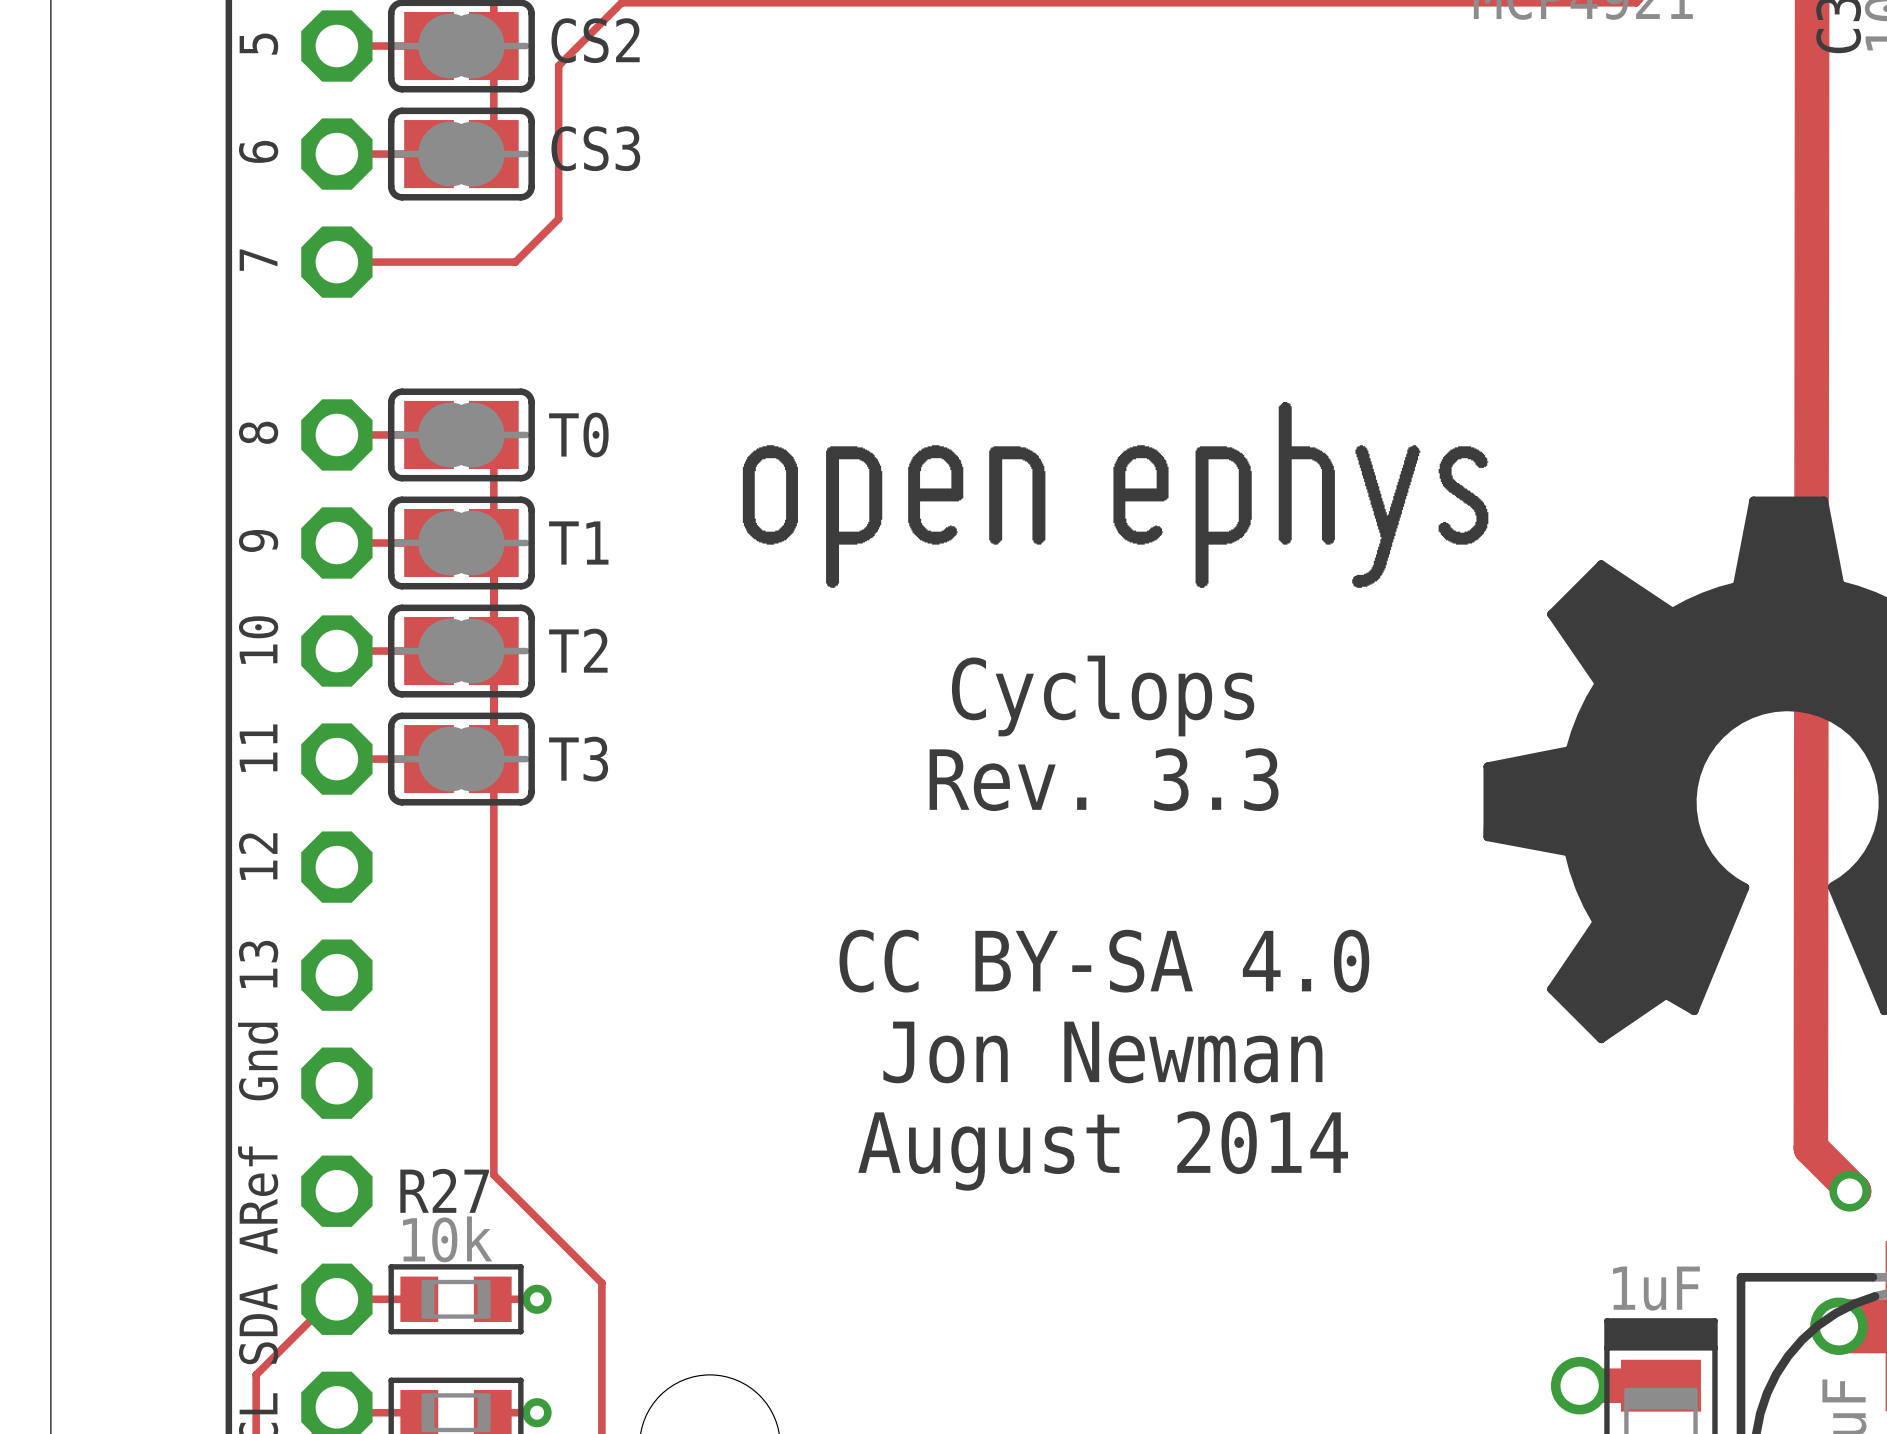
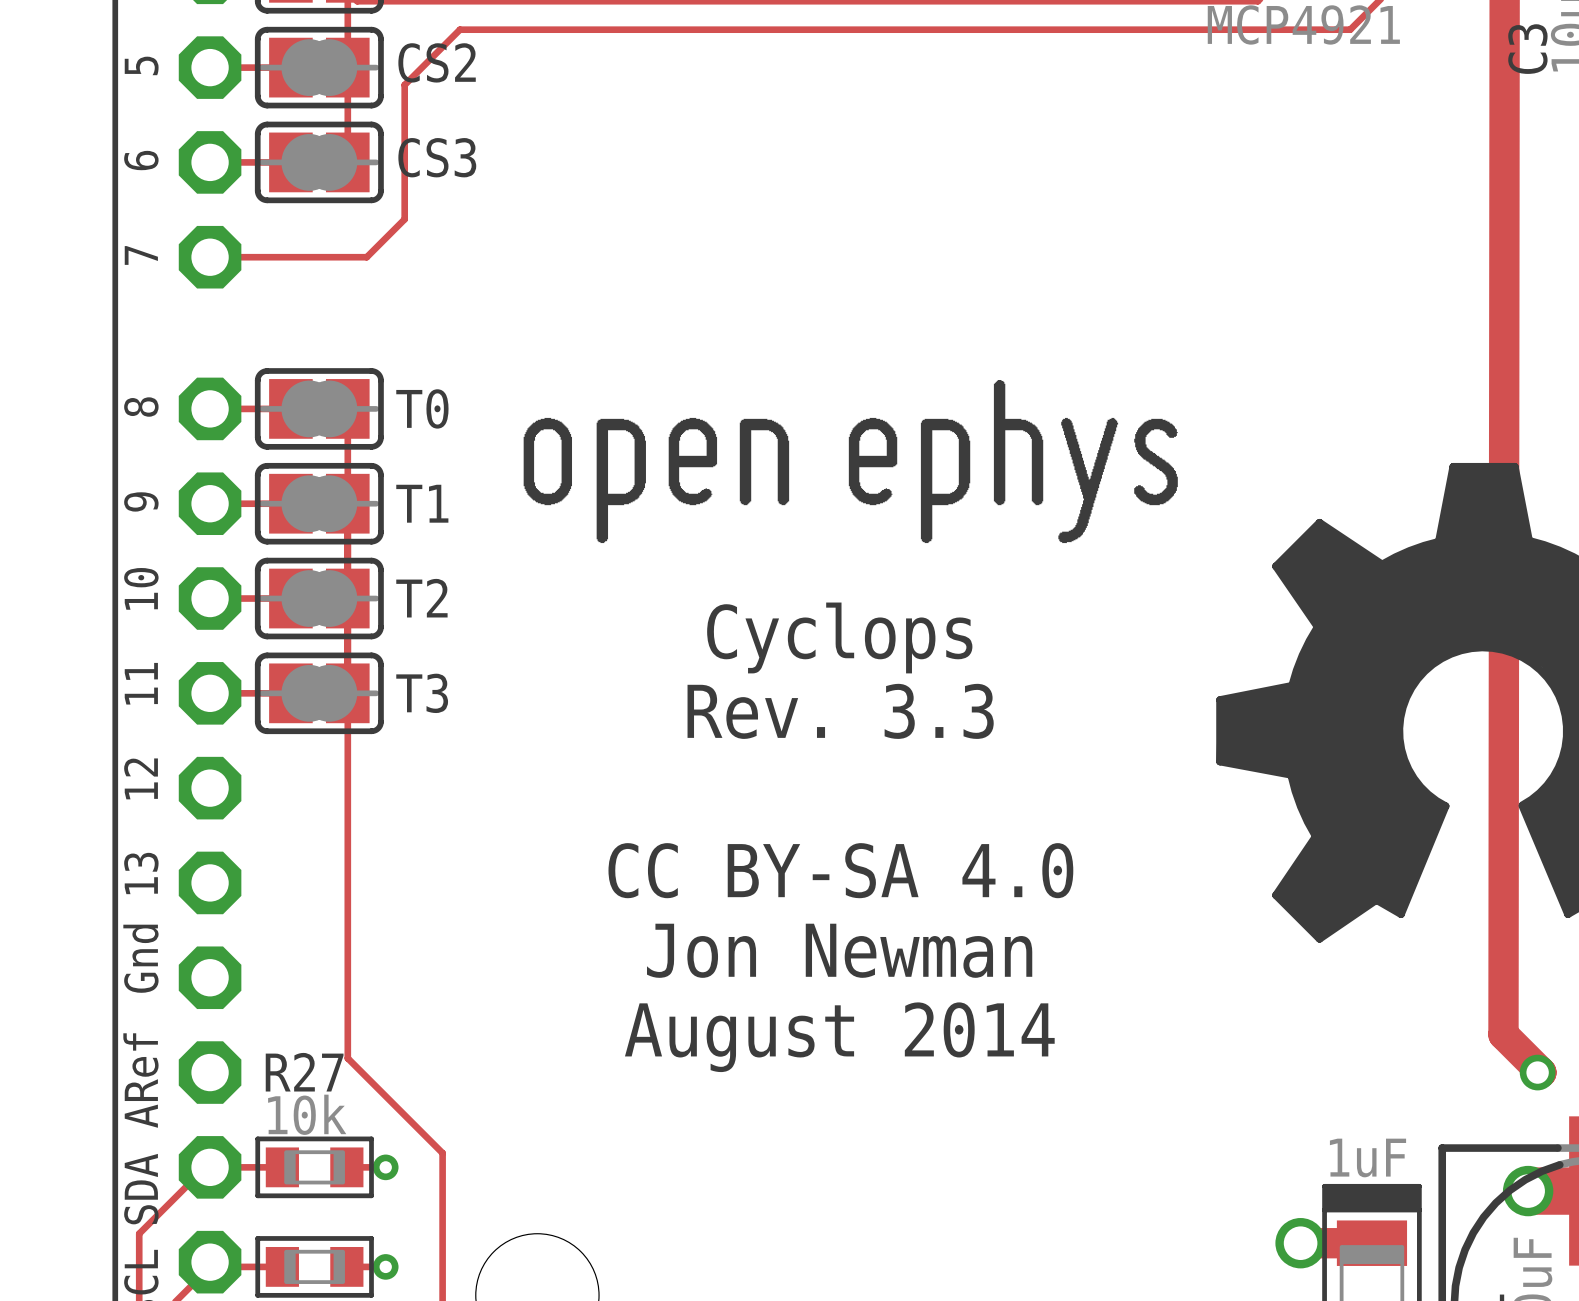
drawing position: (1115, 494) -> (850, 461)
text position: Cyclops (1103, 695) -> Cyclops (839, 637)
text position: Rev. 3.3 (1104, 779) -> Rev. 3.3 (840, 711)
text position: CC BY-SA 4.0 (1104, 961) -> CC BY-SA 4.0 (840, 870)
text position: Jon Newman (1102, 1052) -> Jon Newman (839, 950)
text position: August 2014 (1103, 1150) -> August 2014 (839, 1037)

